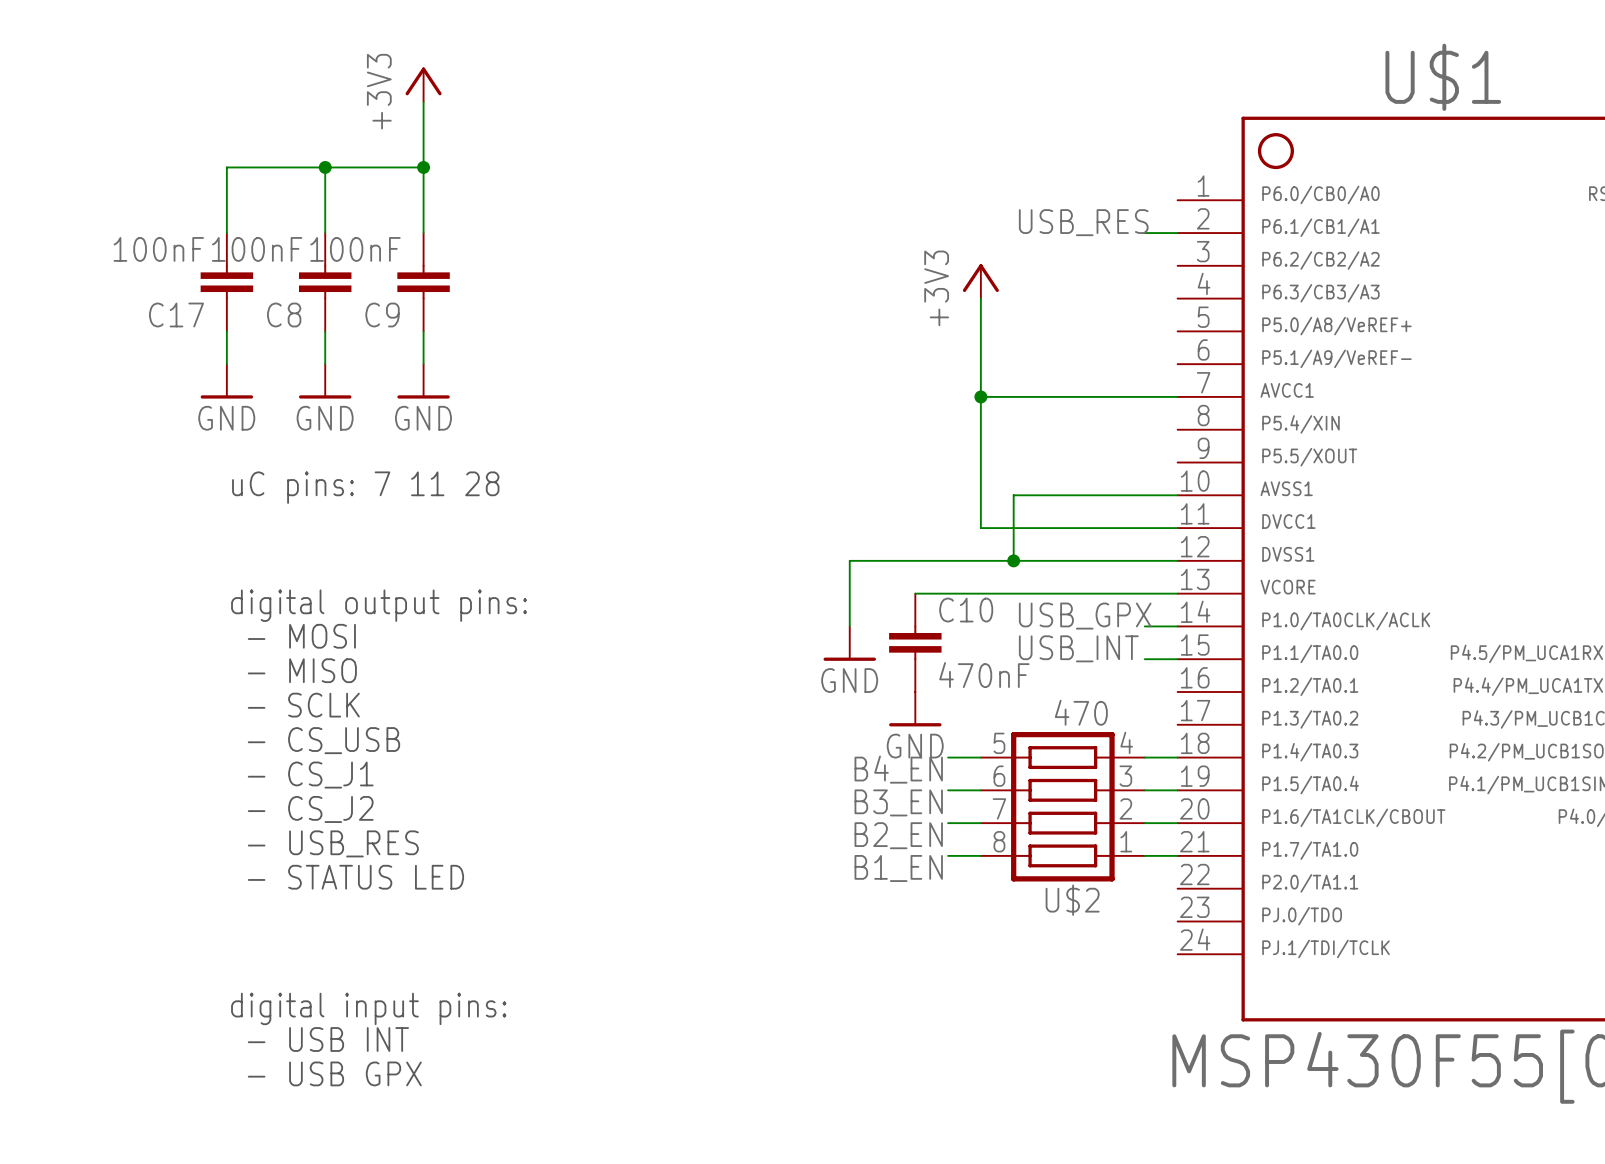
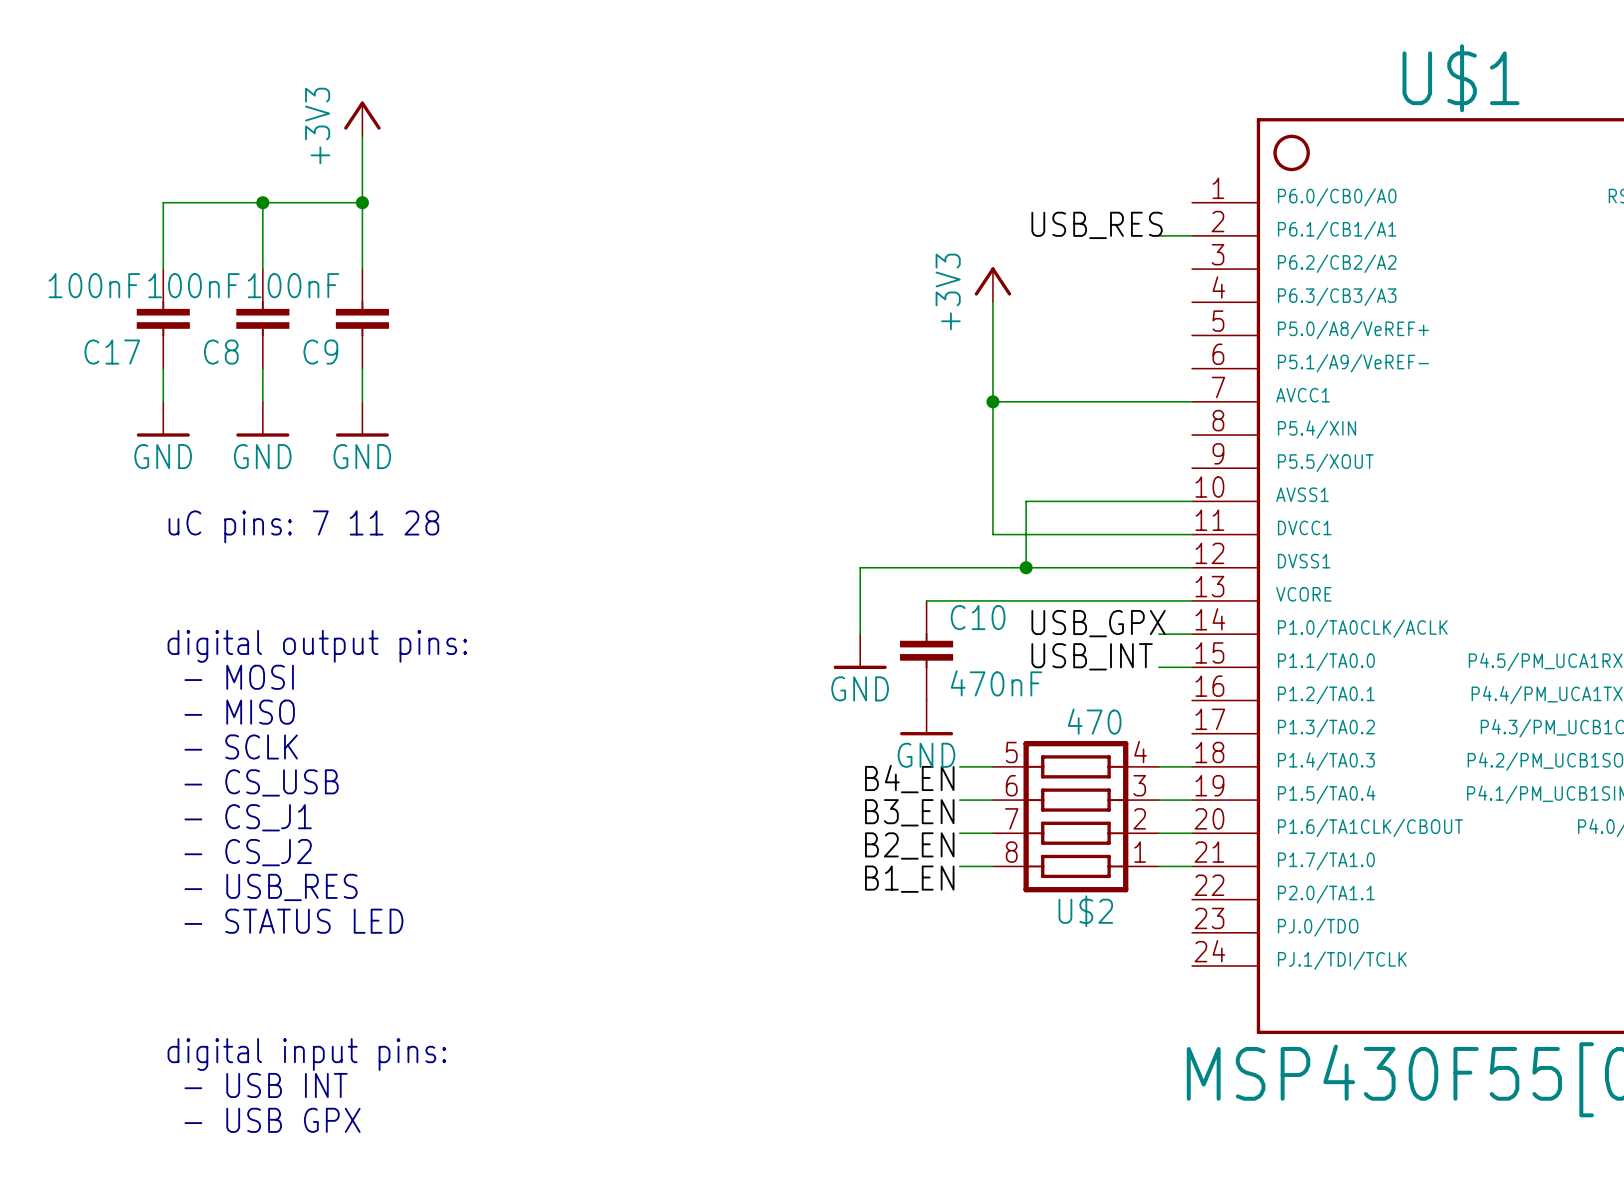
power symbol position: +3V3 (423, 84) -> +3V3 (362, 118)
wire: (423, 101) (423, 233) -> (362, 136) (362, 269)
wire: (325, 167) (325, 233) -> (262, 202) (262, 269)
junction: (325, 167) -> none
wire: (423, 167) (226, 167) (226, 233) -> (362, 202) (163, 202) (163, 269)
junction: (423, 167) -> none
junction: none -> (262, 202)
junction: none -> (362, 202)
C17 position: (226, 282) -> (163, 318)
C8 position: (325, 282) -> (262, 318)
C9 position: (423, 282) -> (362, 318)
wire: (226, 331) (226, 364) -> (163, 368) (163, 401)
wire: (325, 331) (325, 364) -> (262, 368) (262, 401)
wire: (423, 331) (423, 364) -> (362, 368) (362, 401)
power symbol: GND (226, 381) -> none
power symbol: GND (325, 381) -> none
power symbol: GND (423, 381) -> none
power symbol: none -> GND (163, 419)
power symbol: none -> GND (262, 419)
power symbol: none -> GND (362, 419)
text position: uC pins: 7 11 28 (365, 487) -> uC pins: 7 11 28 (303, 526)
text position: digital output pins: (379, 605) -> digital output pins: (317, 646)
text position: - MOSI (301, 636) -> - MOSI (239, 677)
text position: - MISO (302, 670) -> - MISO (239, 712)
text position: - SCLK (303, 705) -> - SCLK (241, 746)
text position: - CS_USB (323, 740) -> - CS_USB (261, 782)
text position: - CS_J1 (310, 775) -> - CS_J1 (248, 817)
text position: - CS_J2 (310, 809) -> - CS_J2 (248, 852)
text position: - USB_RES (333, 843) -> - USB_RES (271, 887)
text position: - STATUS LED (355, 877) -> - STATUS LED (293, 921)
text position: digital input pins: (368, 1008) -> digital input pins: (306, 1054)
text position: - USB INT (328, 1039) -> - USB INT (266, 1085)
text position: - USB GPX (334, 1073) -> - USB GPX (272, 1120)

